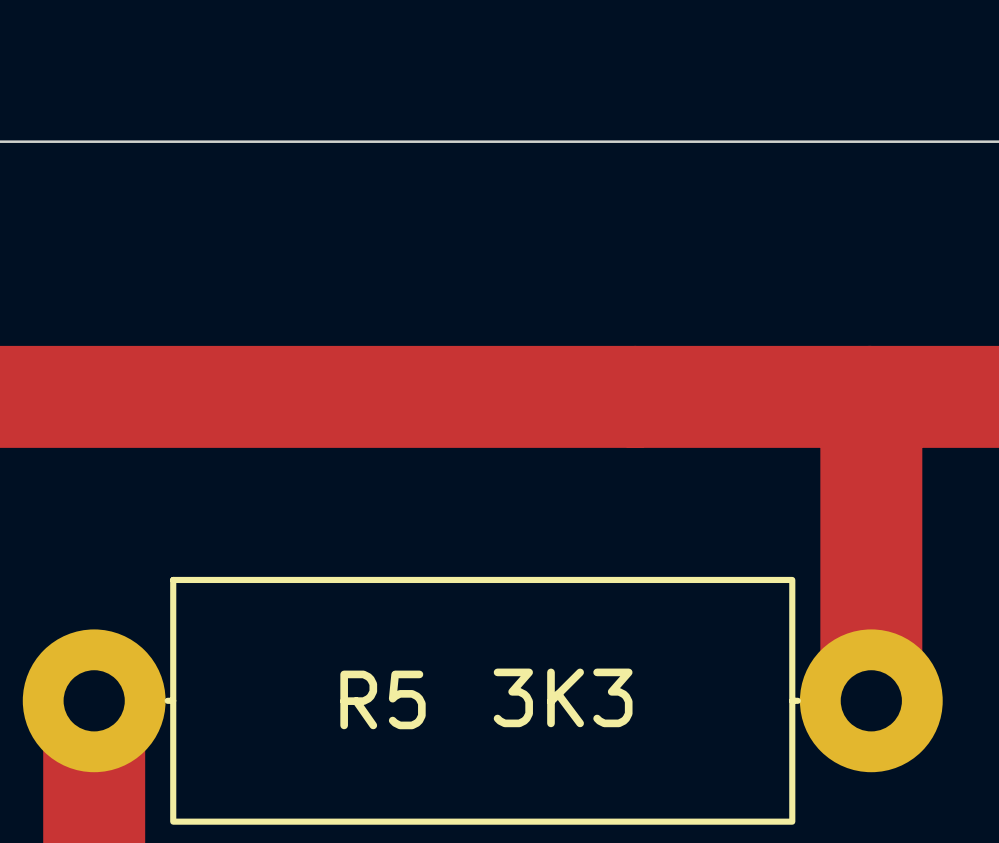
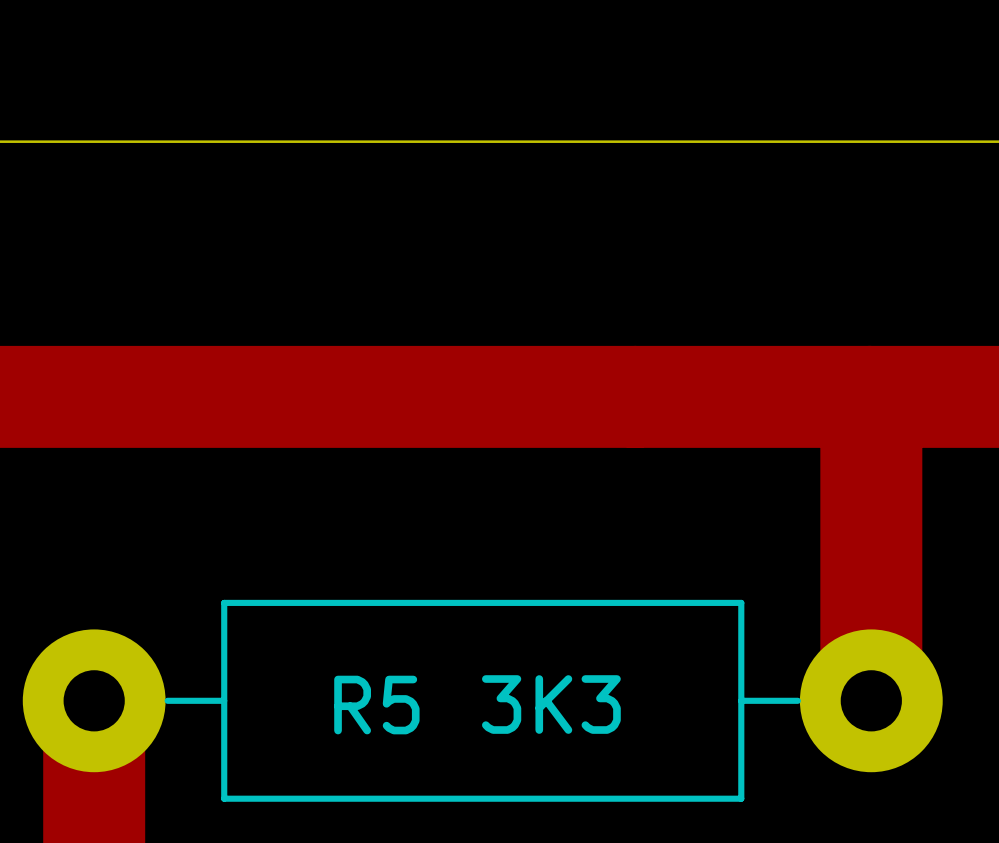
R5 footprint: [22, 576, 943, 825] -> [22, 599, 943, 802]

